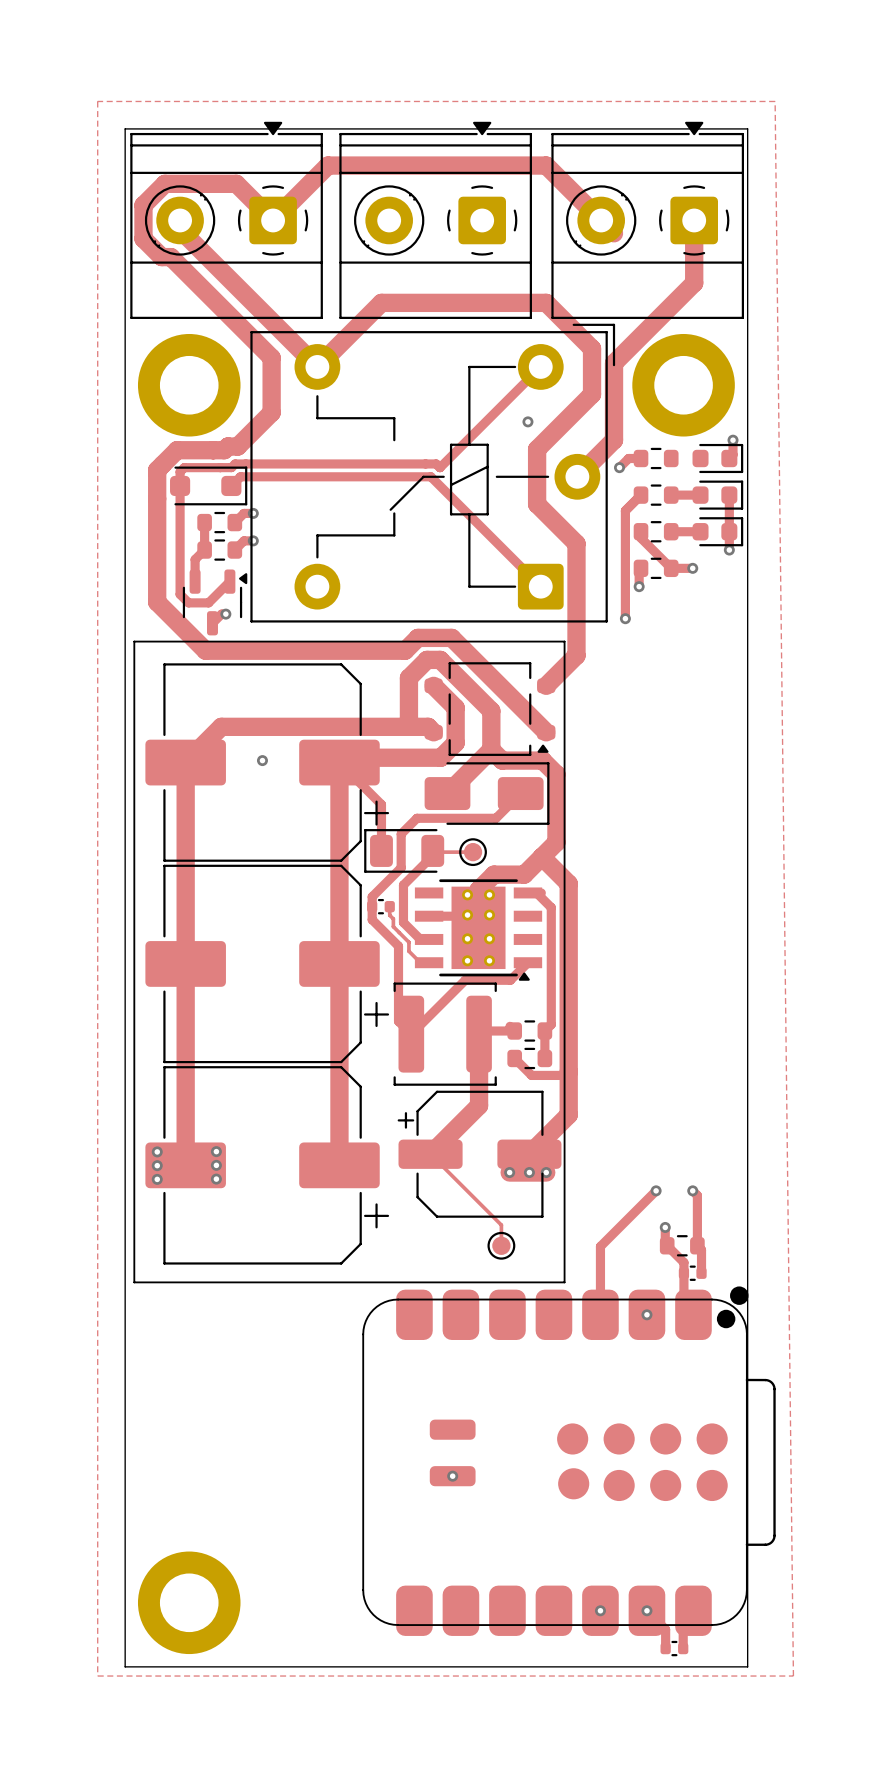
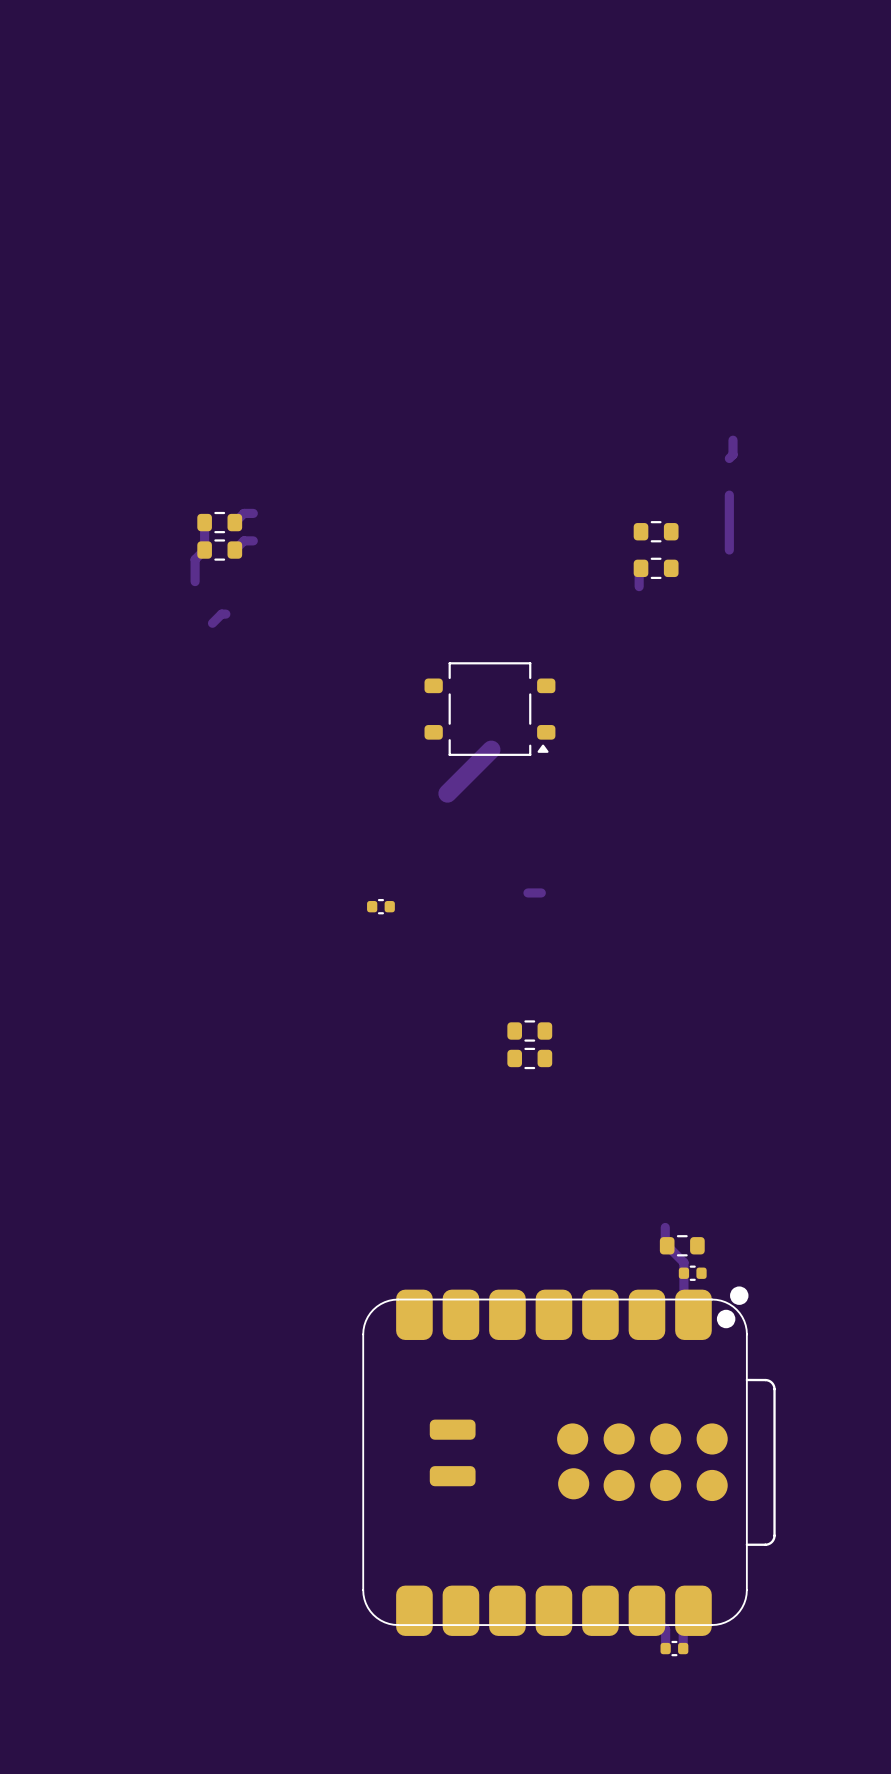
zone outline: (97, 101) (97, 1676) (793, 1676) (775, 101) (97, 101) -> none
board edge: (125, 128) (747, 128) (747, 1666) (125, 1666) (125, 128) -> none
track: (180, 220) (180, 229) (317, 366) (381, 302) (546, 302) (592, 348) (592, 394) (537, 449) (537, 504) (576, 543) (576, 655) (546, 685) -> none
part: (226, 220) -> none
part: (435, 220) -> none
part: (647, 220) -> none
track: (694, 220) (694, 283) (614, 363) (614, 440) (577, 476) -> none
track: (614, 233) (546, 165) (328, 165) (273, 220) (236, 183) (164, 183) (143, 205) (143, 238) (161, 257) (170, 257) (271, 357) (271, 412) (237, 446) (227, 446) (224, 450) (177, 450) (157, 470) (157, 602) (205, 650) (405, 650) (417, 637) (451, 637) (546, 732) -> none
track: (540, 366) (440, 467) -> none
part: (189, 385) -> none
part: (683, 385) -> none
via: (527, 421) -> none
via: (733, 440) -> none
track: (641, 458) (628, 458) (619, 467) -> none
part: (656, 458) -> none
part: (717, 458) -> none
track: (439, 467) (436, 463) (235, 463) (231, 467) (184, 467) (180, 471) (180, 594) (188, 602) (208, 602) (229, 581) -> none
via: (619, 467) -> none
part: (432, 473) -> none
part: (208, 485) -> none
track: (231, 485) (240, 476) (430, 476) (540, 586) -> none
track: (641, 495) (625, 510) (625, 618) -> none
part: (656, 495) -> none
track: (671, 495) (700, 495) -> none
part: (717, 495) -> none
via: (253, 513) -> none
track: (641, 531) (641, 538) (671, 568) (692, 568) -> none
track: (671, 531) (700, 531) -> none
part: (717, 531) -> none
via: (253, 540) -> none
via: (729, 550) -> none
via: (692, 568) -> none
via: (639, 586) -> none
part: (215, 602) -> none
via: (225, 614) -> none
via: (625, 618) -> none
line: (134, 641) (564, 641) (564, 1282) (134, 1282) (134, 641) -> none
track: (433, 685) (455, 707) (455, 742) (440, 757) (344, 757) (339, 762) -> none
track: (408, 726) (408, 677) (427, 659) (440, 659) (491, 710) (491, 749) (502, 760) (542, 760) (556, 774) (556, 842) (524, 874) (493, 874) (478, 890) (478, 927) (466, 916) (429, 916) -> none
track: (433, 732) (428, 726) (221, 726) (185, 762) (185, 1165) -> none
via: (262, 760) -> none
part: (267, 762) -> none
track: (339, 762) (339, 1165) -> none
track: (339, 762) (381, 804) (381, 850) -> none
part: (487, 793) -> none
track: (520, 793) (495, 818) (416, 818) (401, 834) (401, 867) (372, 896) (372, 919) (398, 946) (398, 1021) (411, 1034) (465, 980) (510, 980) (527, 962) -> none
part: (404, 850) -> none
track: (473, 852) (432, 850) (432, 855) (403, 885) (403, 922) (420, 939) (429, 939) -> none
part: (473, 852) -> none
track: (541, 856) (568, 883) (568, 1114) (529, 1154) (529, 1161) -> none
track: (536, 892) (551, 907) (551, 1024) (544, 1031) (544, 1058) -> none
track: (389, 906) (389, 915) (393, 918) (393, 926) (408, 942) (408, 951) (420, 962) (429, 962) -> none
part: (478, 930) -> none
part: (267, 963) -> none
track: (510, 1026) (514, 1031) (482, 1031) (479, 1034) (479, 1105) (430, 1154) (501, 1225) (501, 1245) -> none
part: (445, 1034) -> none
track: (514, 1058) (531, 1075) (565, 1075) (568, 1071) -> none
via: (157, 1151) -> none
via: (216, 1151) -> none
part: (479, 1154) -> none
via: (157, 1165) -> none
via: (216, 1165) -> none
part: (267, 1165) -> none
track: (509, 1172) (546, 1172) -> none
via: (509, 1172) -> none
via: (529, 1172) -> none
via: (546, 1172) -> none
via: (157, 1179) -> none
via: (216, 1179) -> none
track: (656, 1190) (600, 1246) (600, 1314) -> none
via: (656, 1190) -> none
track: (692, 1190) (697, 1195) (697, 1245) (701, 1249) (701, 1273) -> none
via: (692, 1190) -> none
via: (665, 1227) -> none
part: (501, 1245) -> none
via: (646, 1314) -> none
via: (452, 1476) -> none
part: (189, 1602) -> none
via: (600, 1610) -> none
via: (646, 1610) -> none

